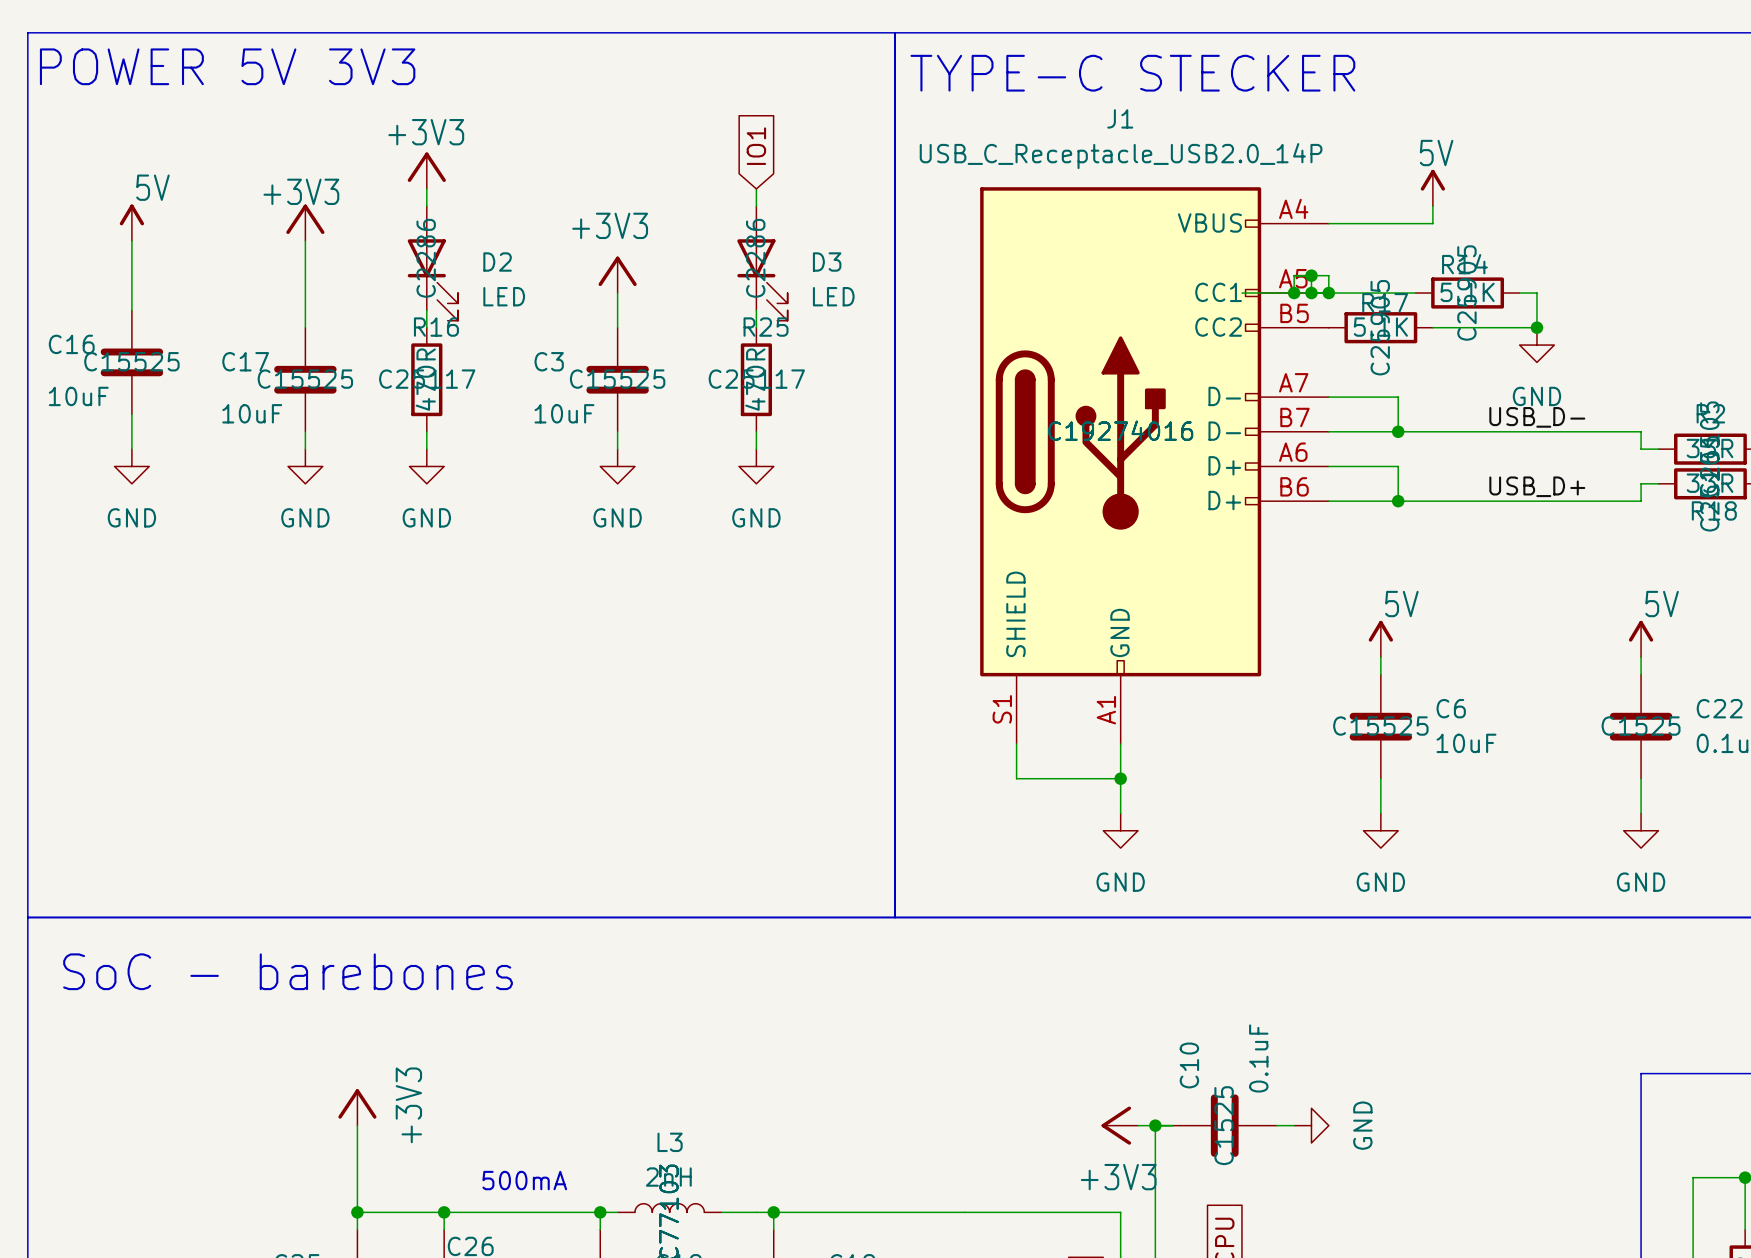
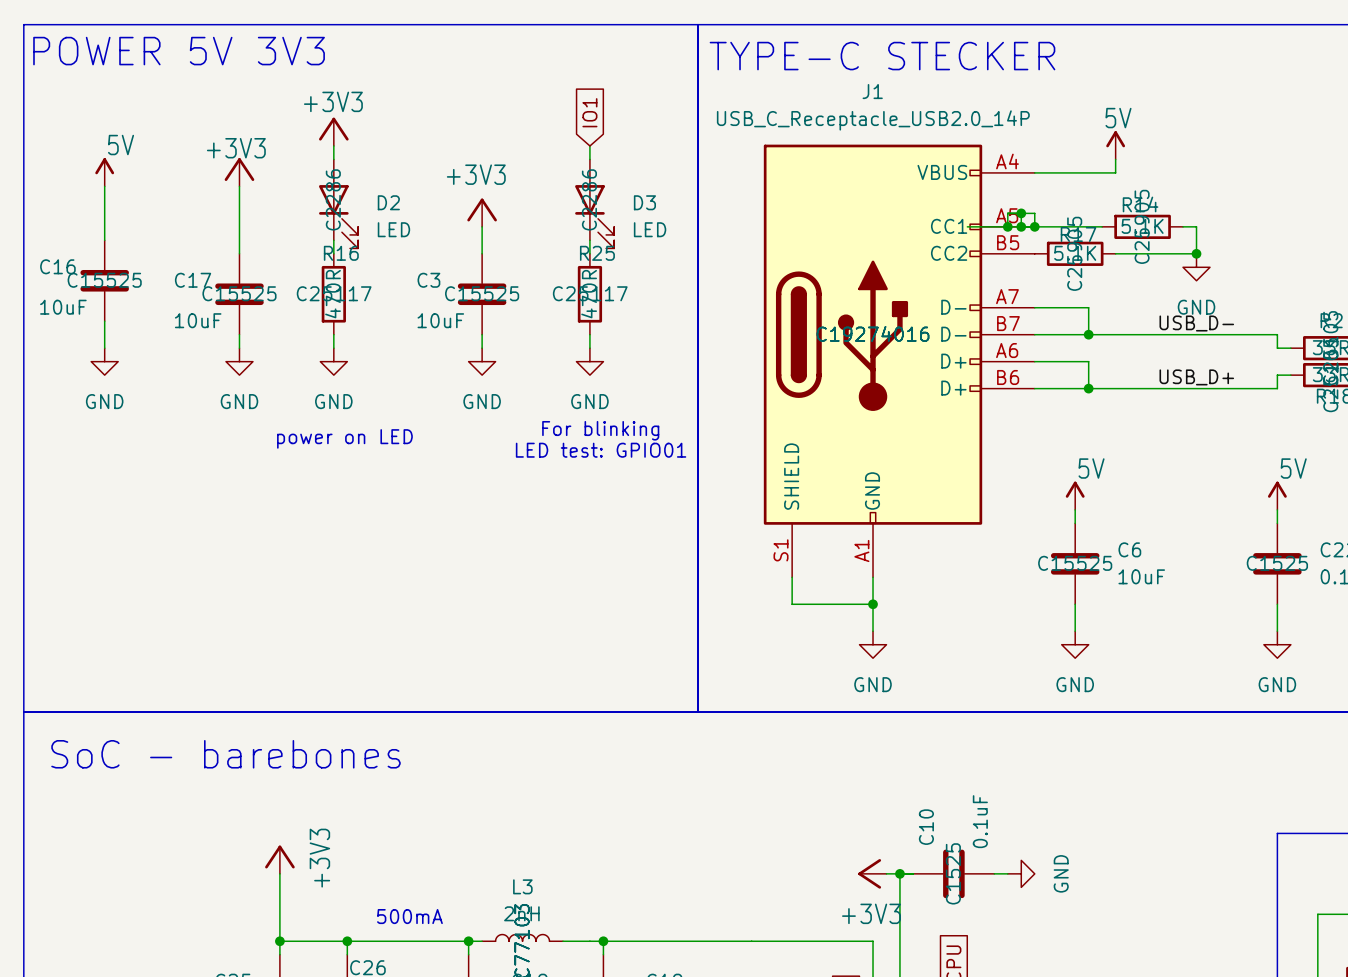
text: none -> For blinking (600, 430)
text: none -> power on LED (344, 438)
text: none -> LED test: GPIO01 (601, 450)

